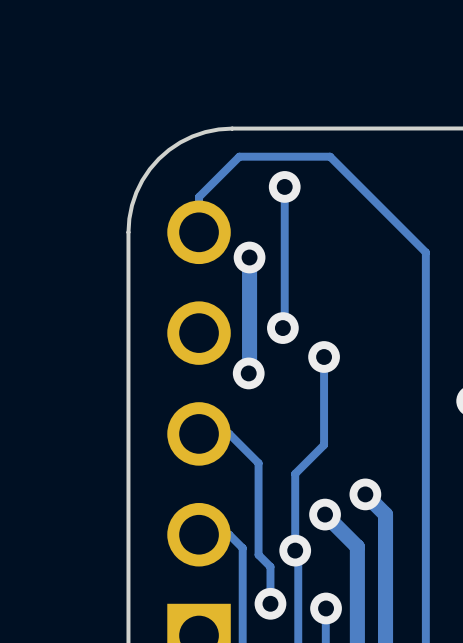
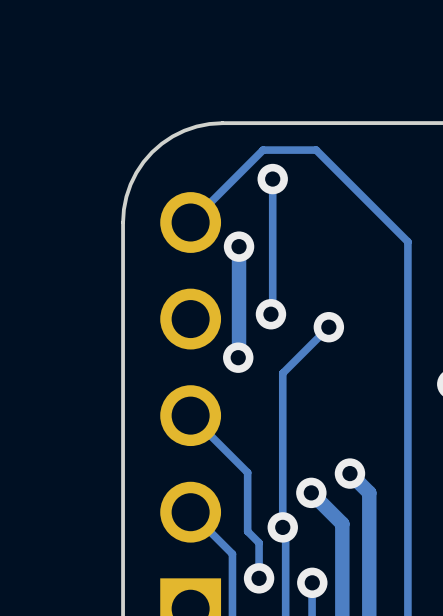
track: (274, 156) (239, 156) (199, 197) (199, 232) -> (263, 150) (190, 222)
track: (324, 356) (324, 444) (295, 473) -> (328, 327) (282, 373) (282, 453)
via position: (324, 356) -> (328, 327)
track: (199, 433) (229, 433) (258, 463) (258, 493) -> (190, 415) (247, 472)
track: (199, 534) (229, 534) (242, 548) (242, 578) -> (190, 512) (232, 554)

